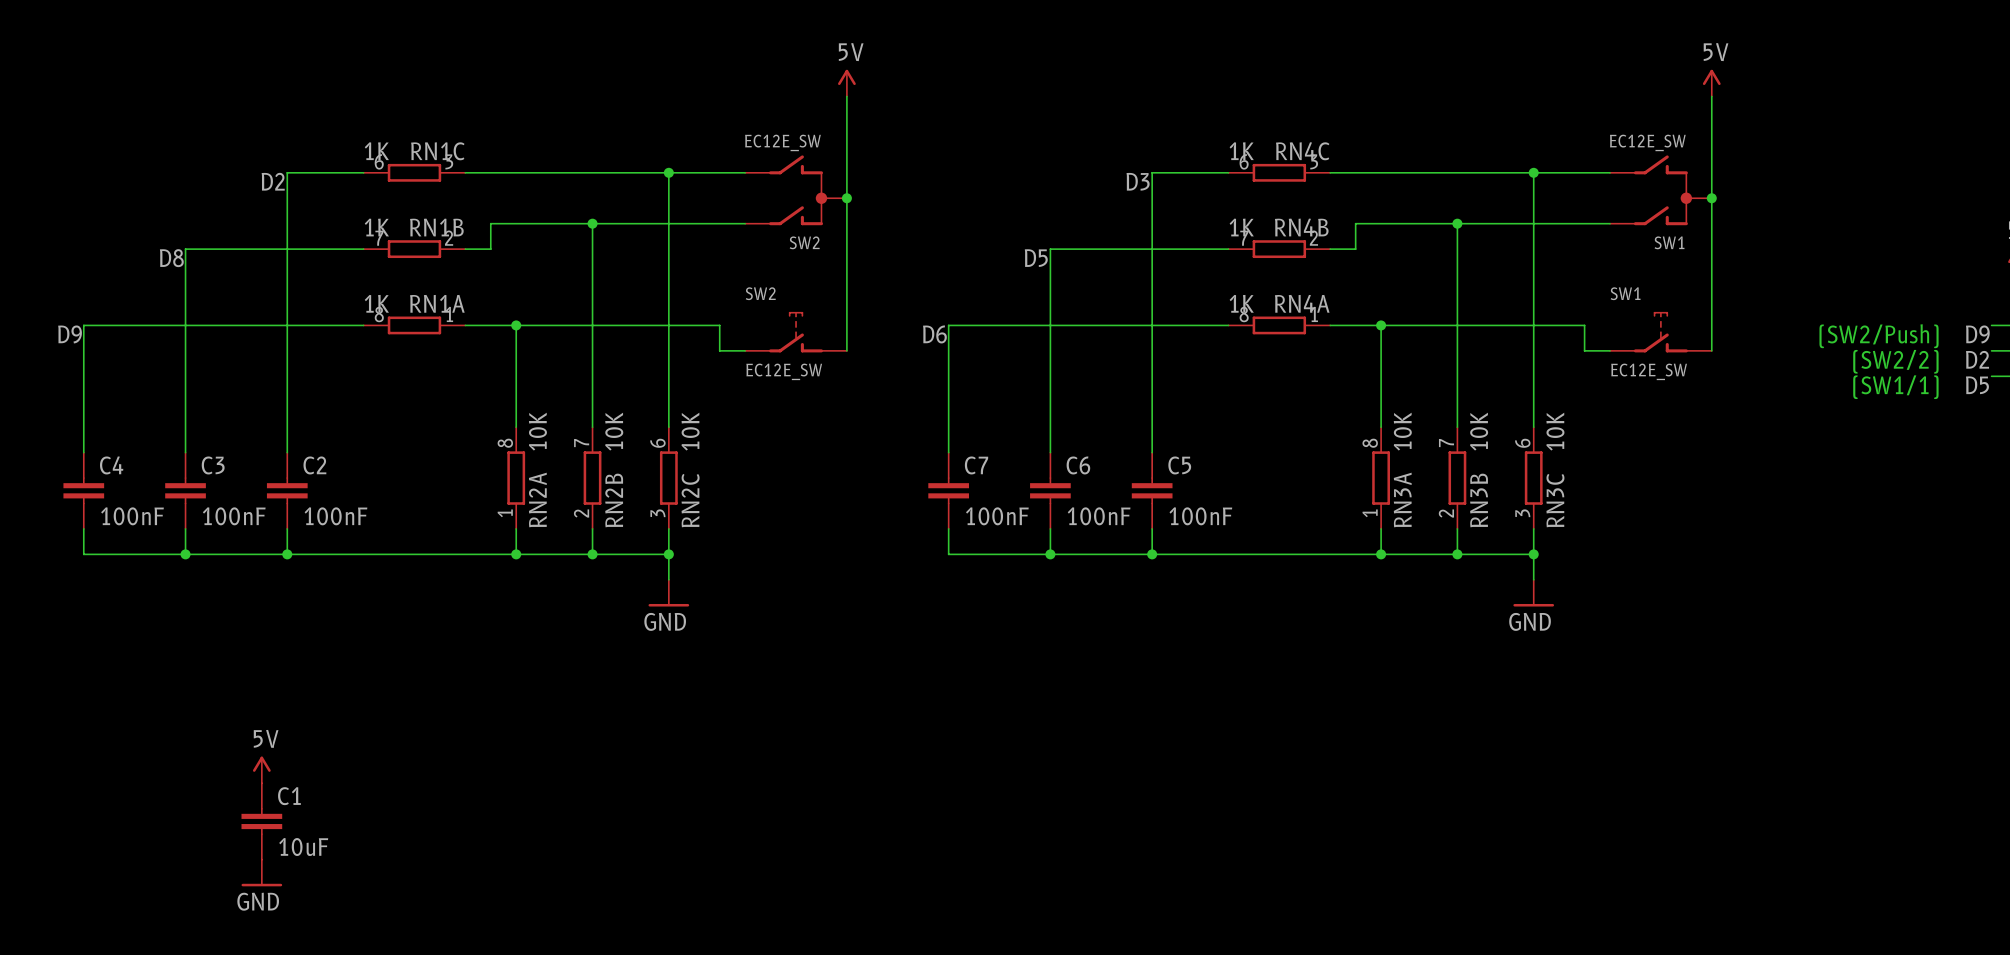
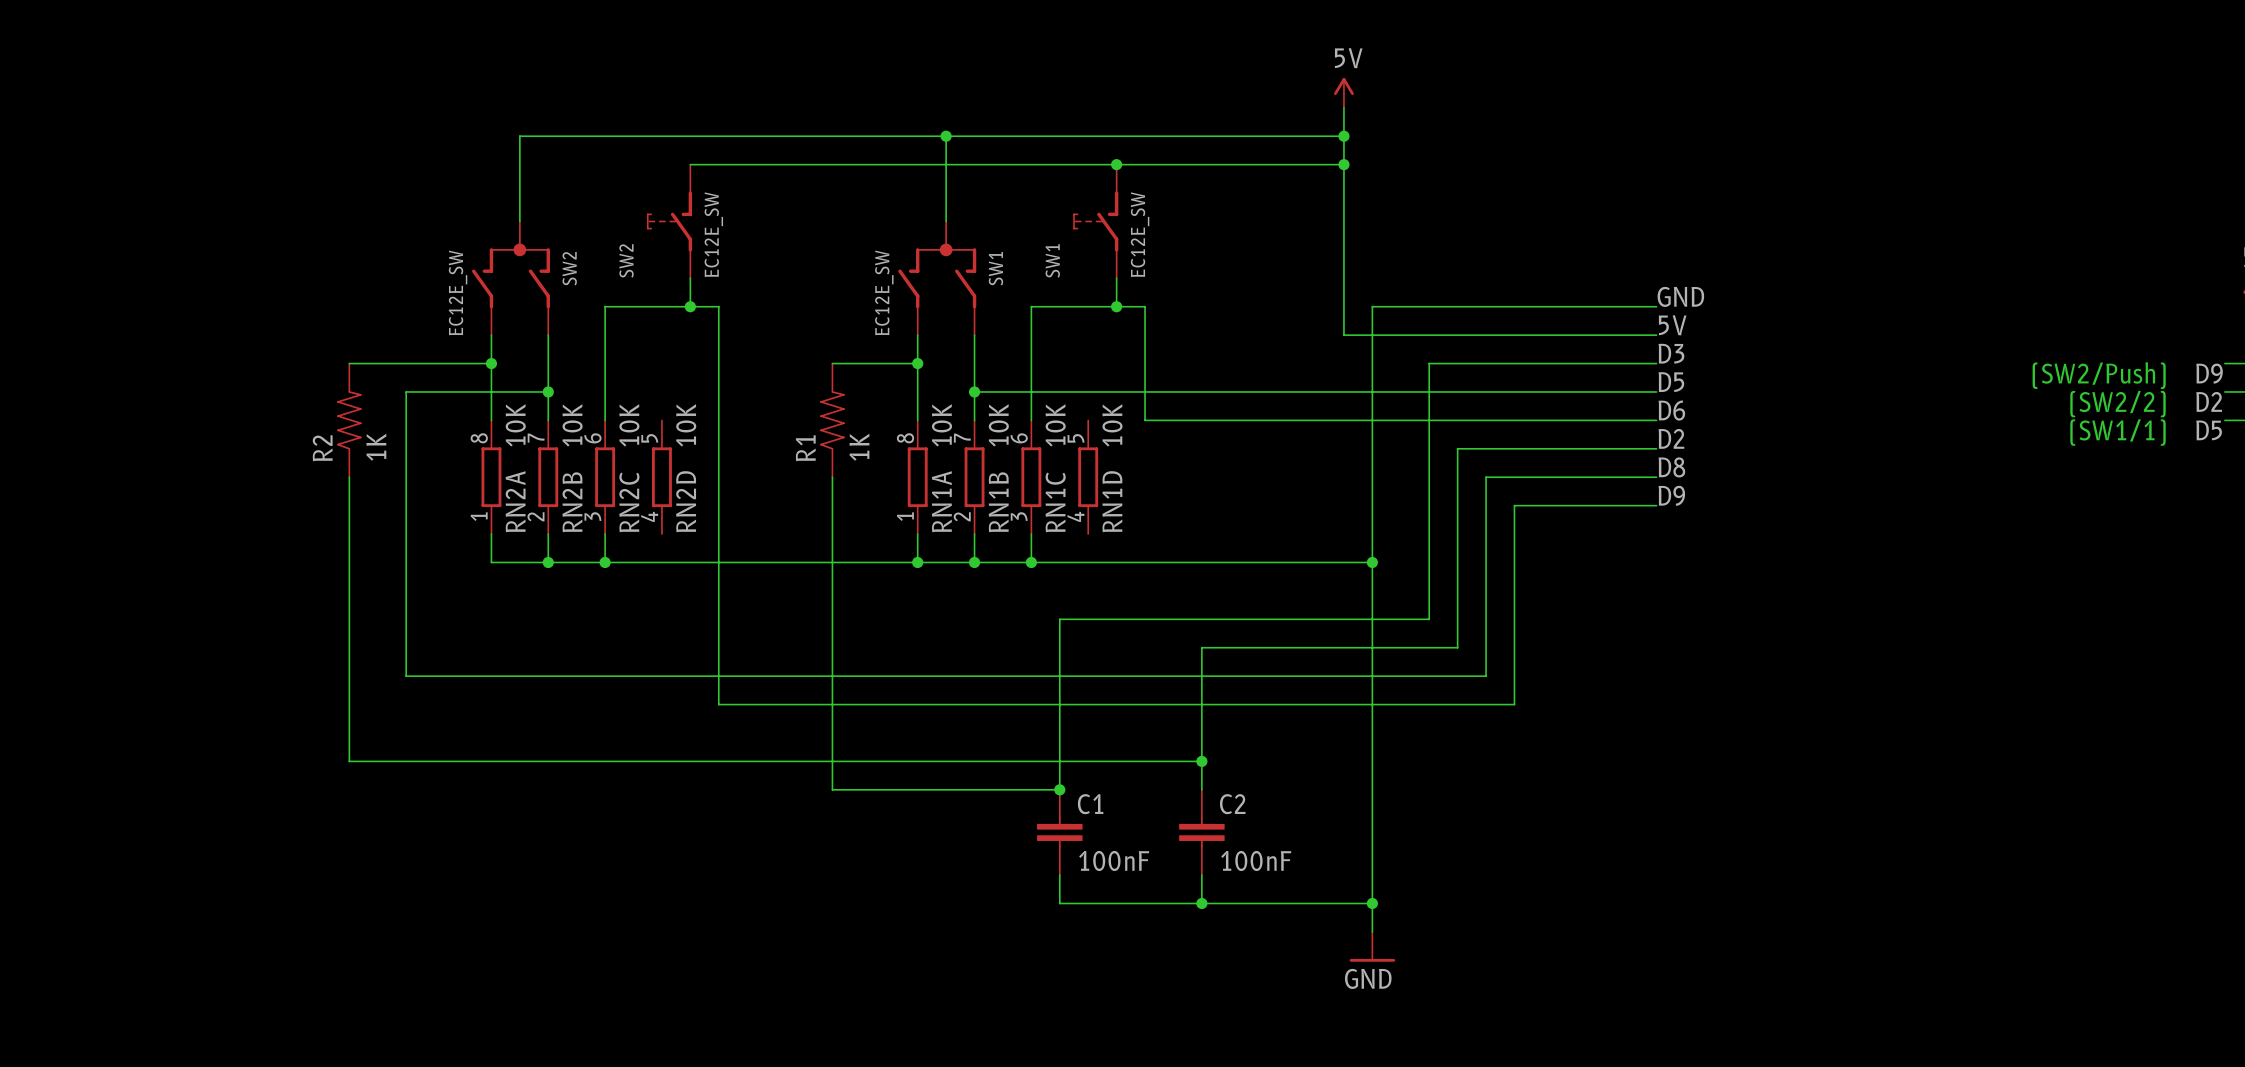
power symbol: 5V (846, 83) -> none
power symbol: none -> 5V (1343, 92)
power symbol: 5V (1711, 83) -> none
wire: (846, 96) (846, 121) -> (1116, 278) (1116, 306)
wire: none -> (1343, 107) (1343, 335) (1656, 335)
wire: (1711, 96) (1711, 350) -> none
junction: none -> (946, 136)
wire: none -> (1343, 136) (519, 136) (519, 221)
junction: none -> (1343, 136)
wire: none -> (690, 164) (1343, 164)
junction: none -> (1116, 164)
junction: none -> (1343, 164)
RN1C value: 1K (376, 151) -> 10K (1055, 425)
wire: (363, 172) (287, 172) (287, 452) -> none
RN1C rotation: 0° (414, 172) -> 90° clockwise (1031, 477)
RN1C position: (414, 172) -> (1031, 477)
wire: (465, 172) (745, 172) -> none
wire: (668, 172) (668, 427) -> none
junction: (668, 172) -> none
wire: (1228, 172) (1152, 172) (1152, 452) -> none
RN4C: 1K (1279, 172) -> none
wire: (1330, 172) (1610, 172) -> none
wire: (1533, 172) (1533, 427) -> none
junction: (1533, 172) -> none
label: D2 (273, 181) -> none
label: D3 (1138, 181) -> none
SW2: EC12E_SW (796, 190) -> none
SW1: EC12E_SW (1660, 190) -> none
wire: (846, 198) (846, 350) -> none
junction: (846, 198) -> none
SW1: none -> EC12E_SW (1095, 221)
junction: (1711, 198) -> none
wire: (592, 223) (592, 427) -> none
junction: (592, 223) -> none
wire: (745, 223) (490, 223) (490, 249) (465, 249) -> none
wire: (1457, 223) (1457, 427) -> none
junction: (1457, 223) -> none
wire: (1610, 223) (1355, 223) (1355, 249) (1330, 249) -> none
RN1B value: 1K (376, 227) -> 10K (998, 425)
wire: (363, 249) (185, 249) (185, 452) -> none
RN1B rotation: 0° (414, 249) -> 90° clockwise (974, 477)
RN1B position: (414, 249) -> (974, 477)
SW2: none -> EC12E_SW (510, 278)
wire: none -> (690, 278) (690, 306)
SW1: none -> EC12E_SW (937, 278)
wire: (1228, 249) (1050, 249) (1050, 452) -> none
RN4B: 1K (1279, 249) -> none
label: D8 (171, 258) -> none
label: D5 (1036, 258) -> none
label: none -> GND (1680, 296)
junction: none -> (690, 306)
junction: none -> (1116, 306)
wire: none -> (1656, 306) (1372, 306) (1372, 931)
label: none -> 5V (1672, 325)
wire: none -> (491, 335) (491, 420)
wire: none -> (548, 335) (548, 420)
wire: none -> (917, 335) (917, 420)
wire: none -> (974, 335) (974, 420)
RN1A value: 1K (376, 303) -> 10K (941, 425)
label: none -> D3 (1671, 353)
wire: (312, 325) (83, 325) (83, 452) -> none
wire: none -> (406, 363) (491, 363)
RN1A rotation: 0° (414, 325) -> 90° clockwise (917, 477)
RN1A position: (414, 325) -> (917, 477)
junction: none -> (491, 363)
wire: (465, 325) (719, 325) (719, 350) (745, 350) -> none
wire: (516, 325) (516, 427) -> none
junction position: (516, 325) -> (548, 391)
wire: none -> (832, 363) (917, 363)
junction: none -> (917, 363)
wire: (1228, 325) (948, 325) (948, 452) -> none
RN4A: 1K (1279, 325) -> none
wire: (1381, 325) (1381, 427) -> none
junction: (1381, 325) -> none
wire: (1482, 325) (1584, 325) (1584, 350) (1610, 350) -> none
SW2 rotation: 0° (796, 332) -> 90° counterclockwise (669, 221)
SW2 position: (796, 332) -> (669, 221)
SW1: EC12E_SW (1660, 332) -> none
label: D9 (70, 334) -> none
label: D6 (934, 334) -> none
label: none -> D5 (1671, 382)
wire: none -> (548, 391) (406, 391) (406, 676) (1486, 676) (1486, 477) (1656, 477)
wire: none -> (974, 391) (1656, 391)
junction: none -> (974, 391)
label: none -> D6 (1671, 410)
R2: none -> 1K (349, 420)
wire: none -> (605, 420) (605, 306) (718, 306) (718, 704) (1514, 704) (1514, 505) (1656, 505)
R1: none -> 1K (832, 420)
wire: none -> (1031, 420) (1031, 306) (1145, 306) (1145, 420) (1656, 420)
label: none -> D2 (1671, 438)
wire: none -> (1656, 448) (1457, 448) (1457, 647) (1201, 647) (1201, 789)
label: none -> D8 (1671, 467)
wire: none -> (349, 477) (349, 761) (1201, 761)
RN2D: none -> 10K (661, 477)
RN1D: none -> 10K (1088, 477)
label: none -> D9 (1671, 495)
wire: none -> (491, 534) (491, 562) (1372, 562)
RN2A position: (516, 478) -> (491, 477)
RN2B position: (592, 478) -> (548, 477)
RN2C position: (668, 478) -> (605, 477)
wire: none -> (917, 534) (917, 562)
wire: none -> (974, 534) (974, 562)
RN3A: 10K (1381, 478) -> none
RN3B: 10K (1457, 478) -> none
RN3C: 10K (1533, 478) -> none
C4: 100nF (83, 490) -> none
C3: 100nF (185, 490) -> none
C2 position: (287, 490) -> (1201, 832)
C7: 100nF (948, 490) -> none
C6: 100nF (1050, 490) -> none
C5: 100nF (1152, 490) -> none
junction: none -> (548, 562)
junction: none -> (605, 562)
junction: none -> (917, 562)
junction: none -> (974, 562)
junction: none -> (1031, 562)
junction: none -> (1372, 562)
wire: (83, 528) (83, 554) (668, 554) -> none
wire: (185, 528) (185, 554) -> none
wire: (287, 528) (287, 554) -> none
wire: (516, 528) (516, 554) -> (548, 534) (548, 562)
wire: (592, 528) (592, 554) -> (605, 534) (605, 562)
wire: (668, 528) (668, 579) -> none
wire: (948, 528) (948, 554) -> (832, 477) (832, 789) (1059, 789) (1059, 619)
wire: (1050, 528) (1050, 554) -> (1031, 534) (1031, 562)
wire: (1152, 528) (1152, 554) -> none
wire: (1381, 528) (1381, 554) -> none
wire: (1457, 528) (1457, 554) -> none
wire: (1533, 528) (1533, 579) -> none
junction: (185, 554) -> none
junction: (287, 554) -> none
junction: (516, 554) -> none
junction: (592, 554) -> none
junction: (668, 554) -> none
junction: (1050, 554) -> none
junction: (1152, 554) -> none
wire: (1279, 554) (1533, 554) -> (1429, 619) (1429, 363) (1486, 363)
junction: (1381, 554) -> none
junction: (1457, 554) -> none
junction: (1533, 554) -> none
power symbol: GND (668, 593) -> none
power symbol: GND (1533, 593) -> none
junction: none -> (1201, 761)
junction: none -> (1059, 789)
power symbol: 5V (261, 769) -> none
wire: none -> (1059, 875) (1059, 903) (1372, 903)
wire: none -> (1201, 875) (1201, 903)
junction: none -> (1201, 903)
junction: none -> (1372, 903)
C1 position: (261, 821) -> (1059, 832)
C1 value: 10uF (303, 847) -> 100nF (1114, 860)
power symbol: none -> GND (1372, 946)
power symbol: GND (261, 872) -> none

